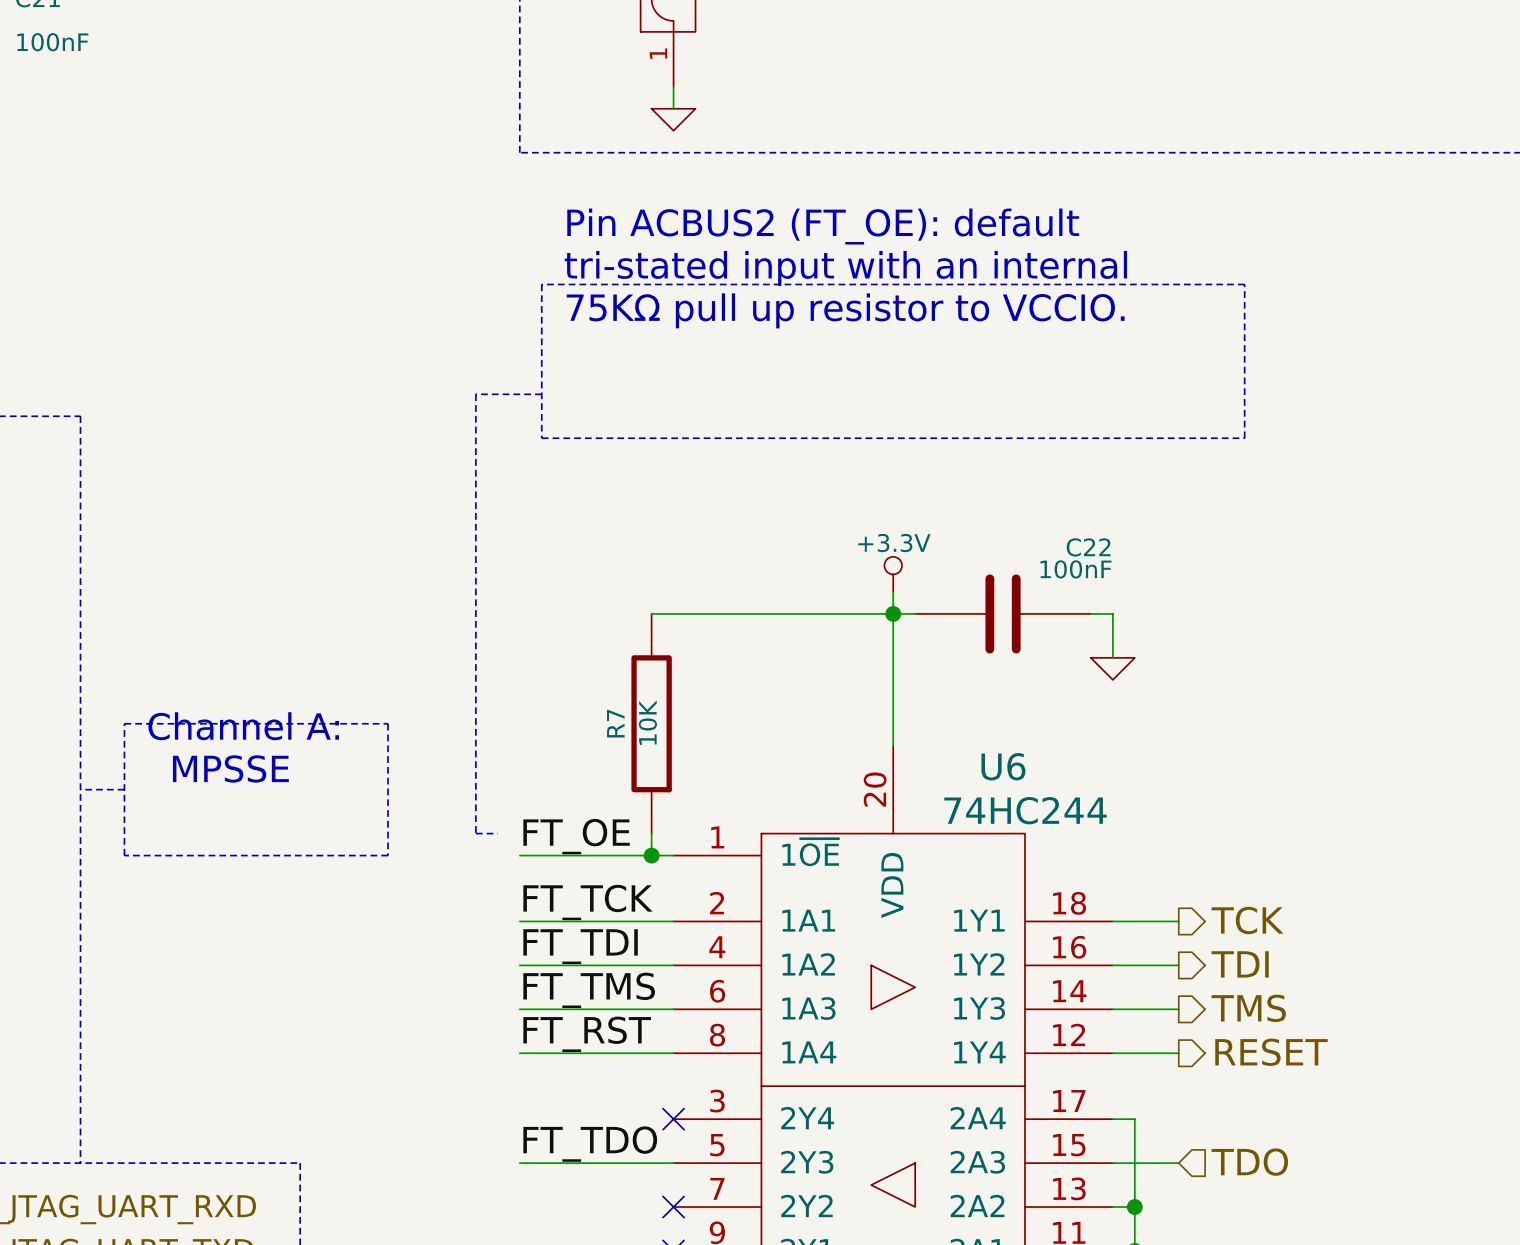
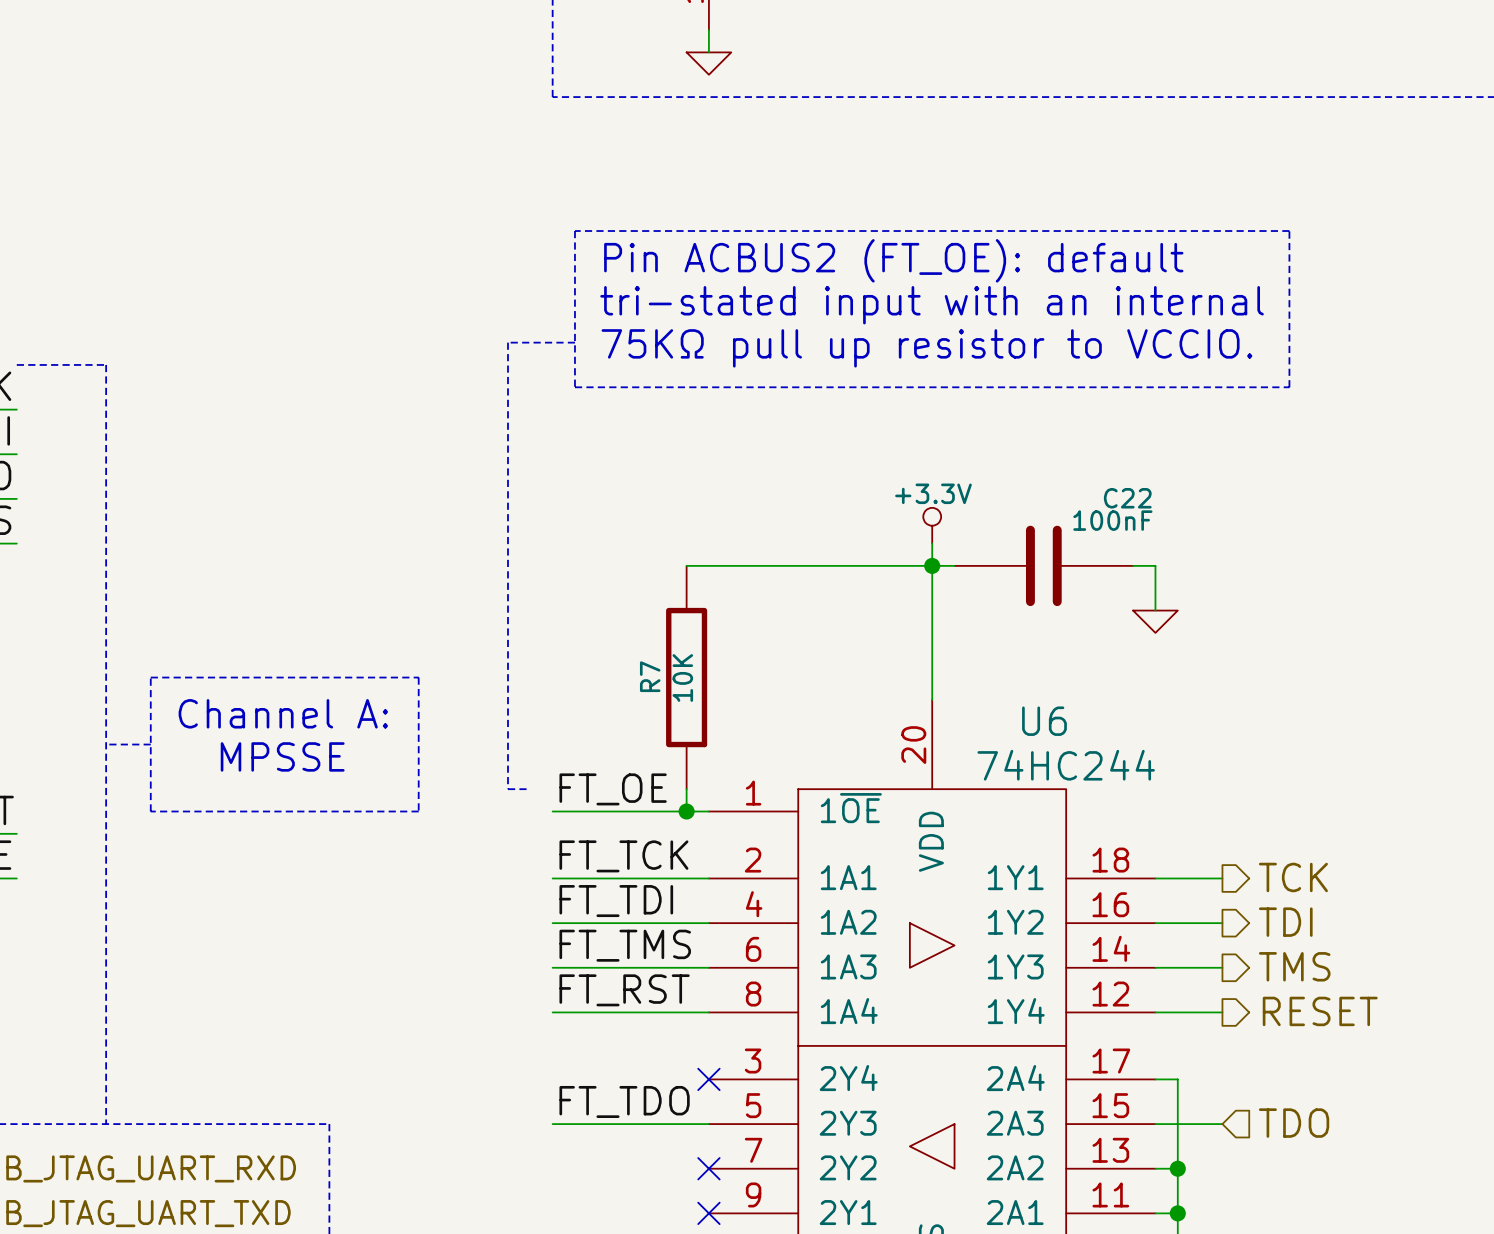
text position: Pin ACBUS2 (FT_OE): default (823, 226) -> Pin ACBUS2 (FT_OE): default (893, 260)
text position: tri-stated input with an internal (845, 268) -> tri-stated input with an internal (932, 305)
text position: 75KΩ pull up resistor to VCCIO. (845, 310) -> 75KΩ pull up resistor to VCCIO. (926, 348)
text position: Channel A: (243, 726) -> Channel A: (283, 713)
text position: MPSSE (230, 768) -> MPSSE (282, 756)

